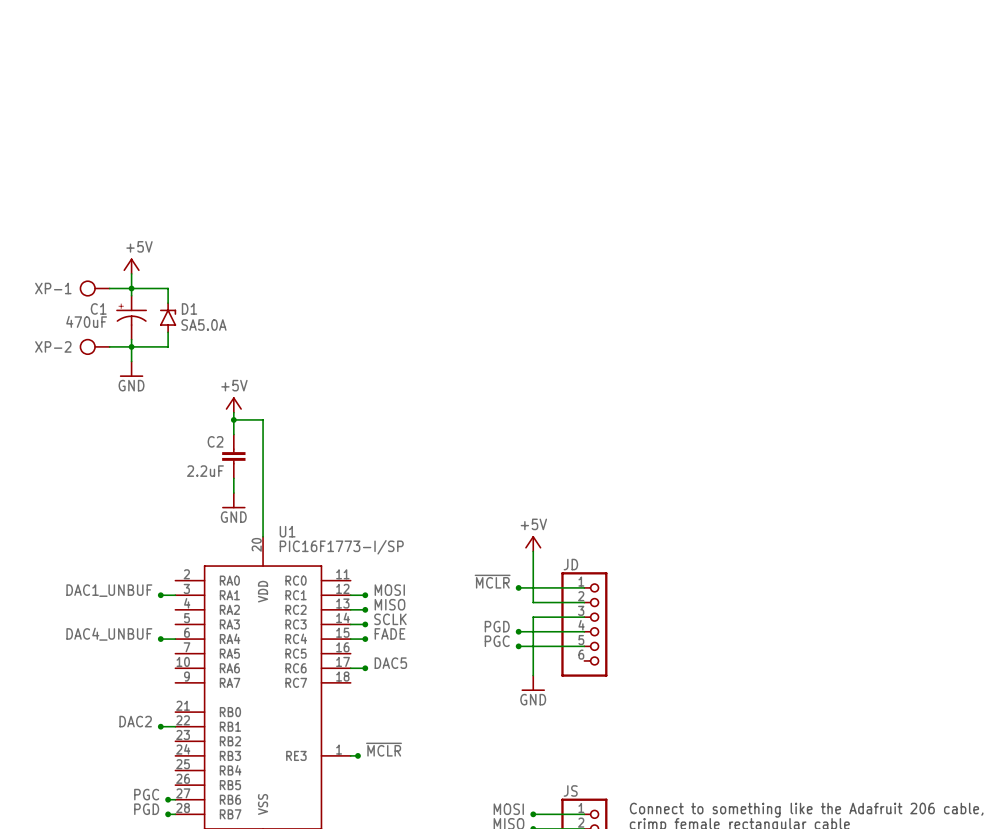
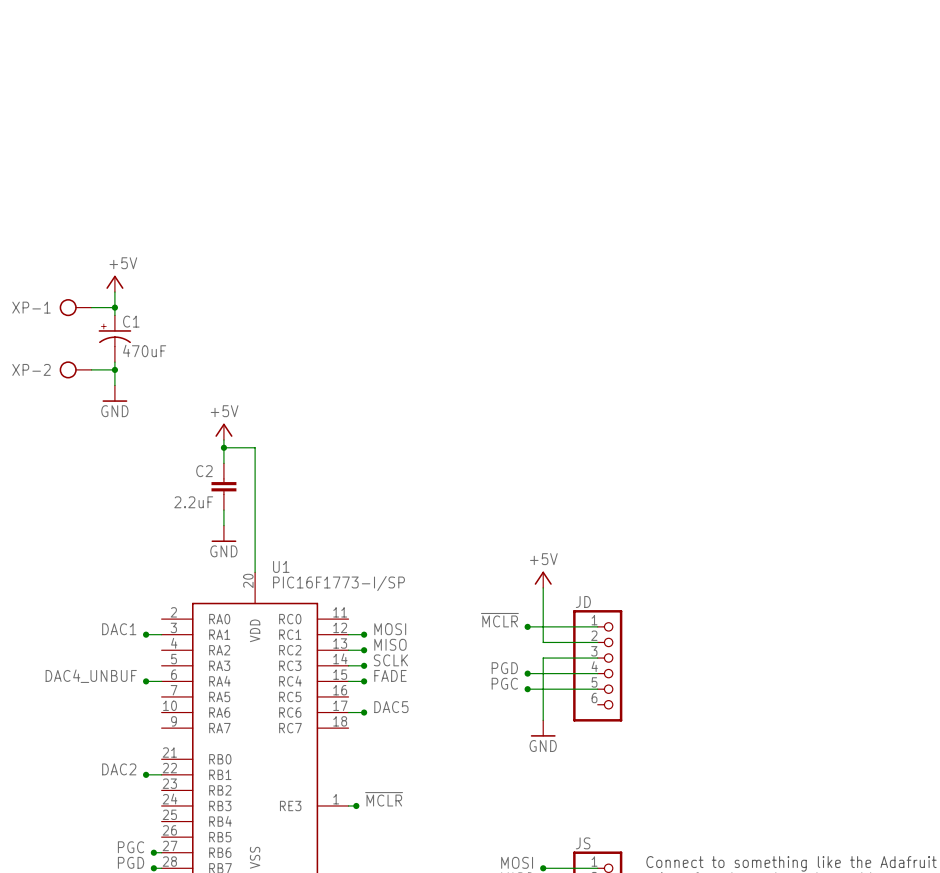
wire: (131, 288) (168, 288) (168, 303) -> none
C1 name position: C1 (98, 308) -> C1 (131, 321)
D1: SA5.0A (168, 317) -> none
C1 value position: 470uF (86, 321) -> 470uF (144, 350)
wire: (168, 332) (168, 346) (131, 346) -> none
label: DAC1_UNBUF (109, 590) -> DAC1 (119, 629)

